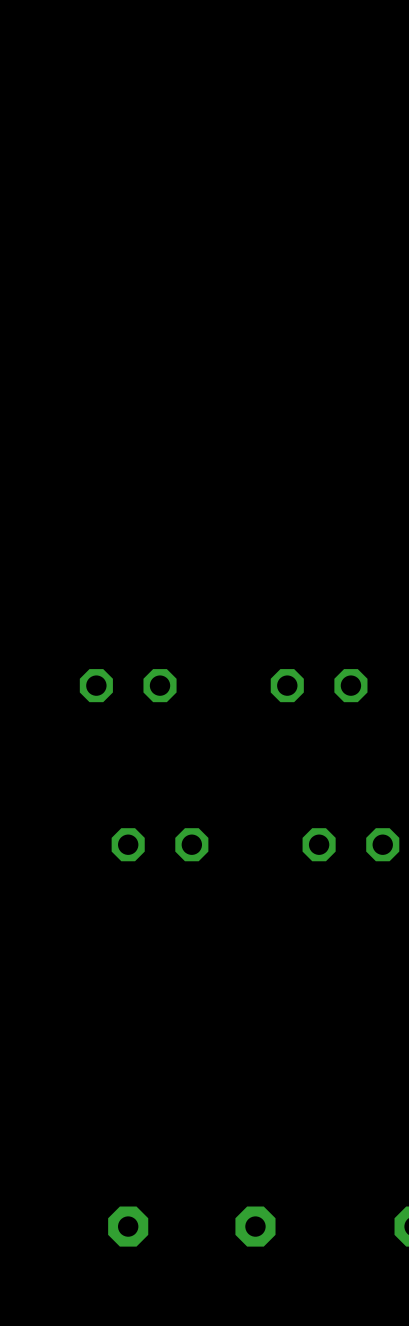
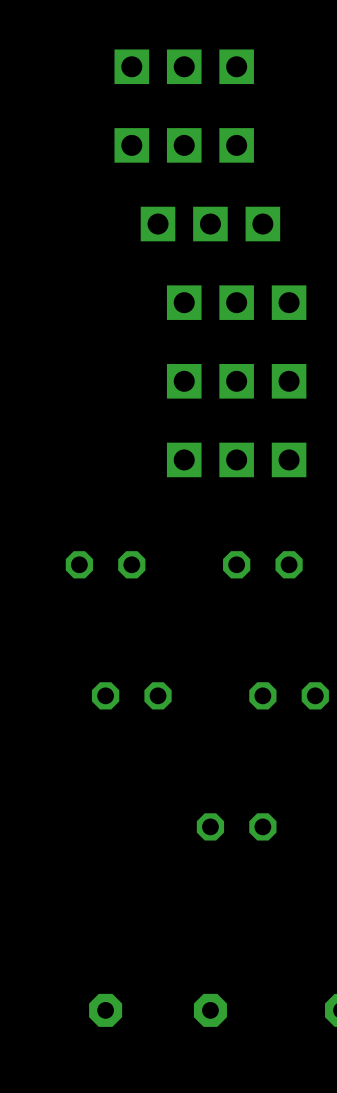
part: none -> (184, 66)
part: none -> (184, 145)
part: none -> (210, 224)
part: none -> (236, 302)
part: none -> (236, 381)
part: none -> (236, 459)
part: none -> (236, 826)

